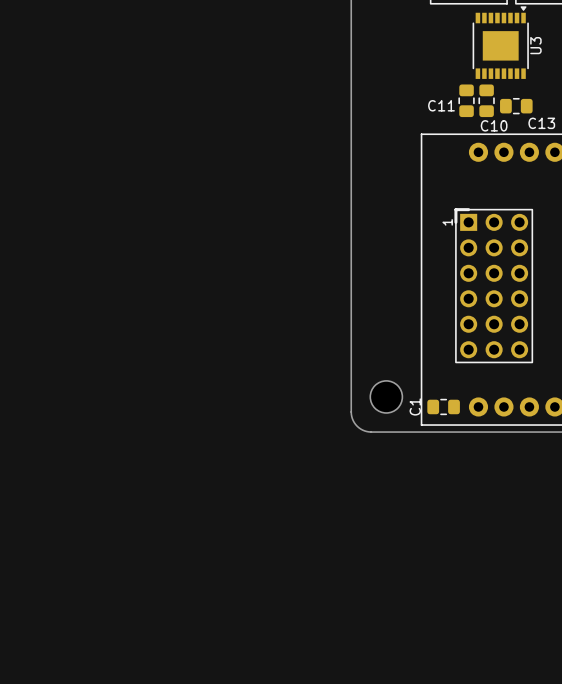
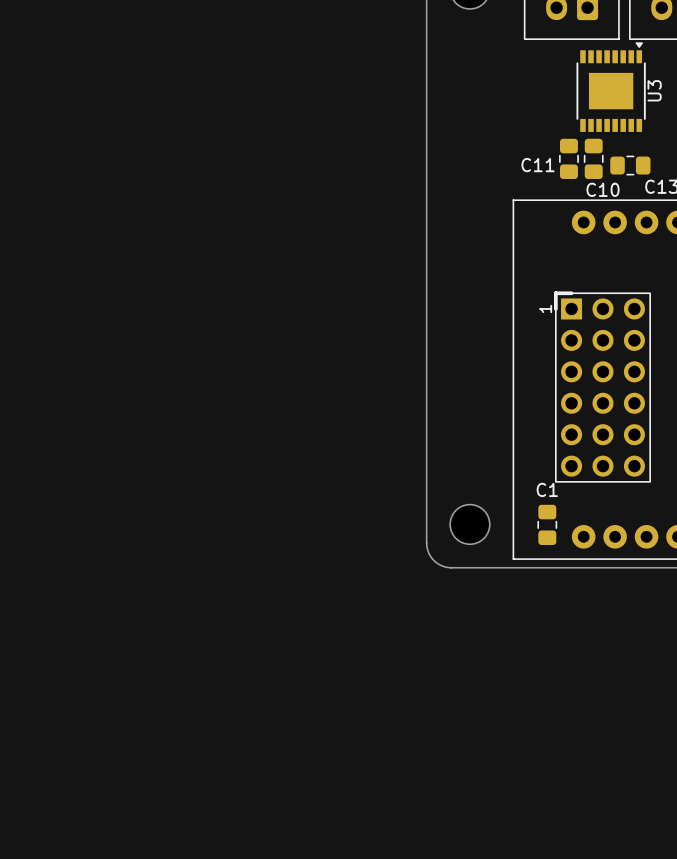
C1 rotation: 0° (443, 406) -> 90° clockwise (547, 524)

